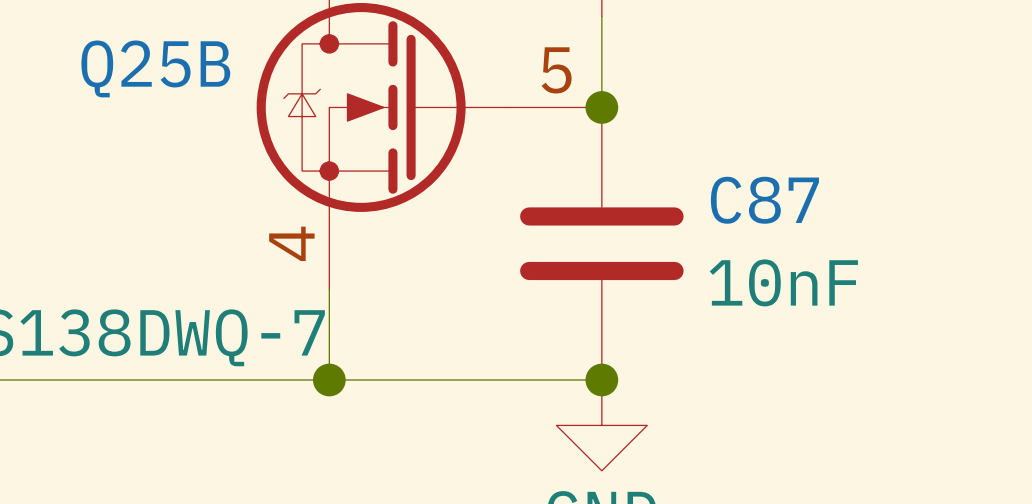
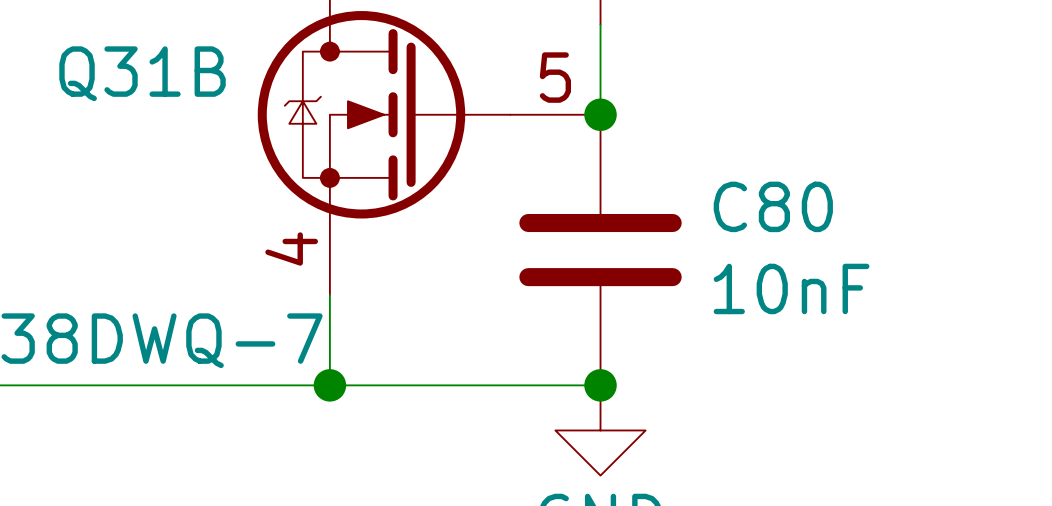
Q25B name: Q25B (155, 68) -> Q31B (142, 73)
C87 name: C87 (764, 200) -> C80 (773, 206)

